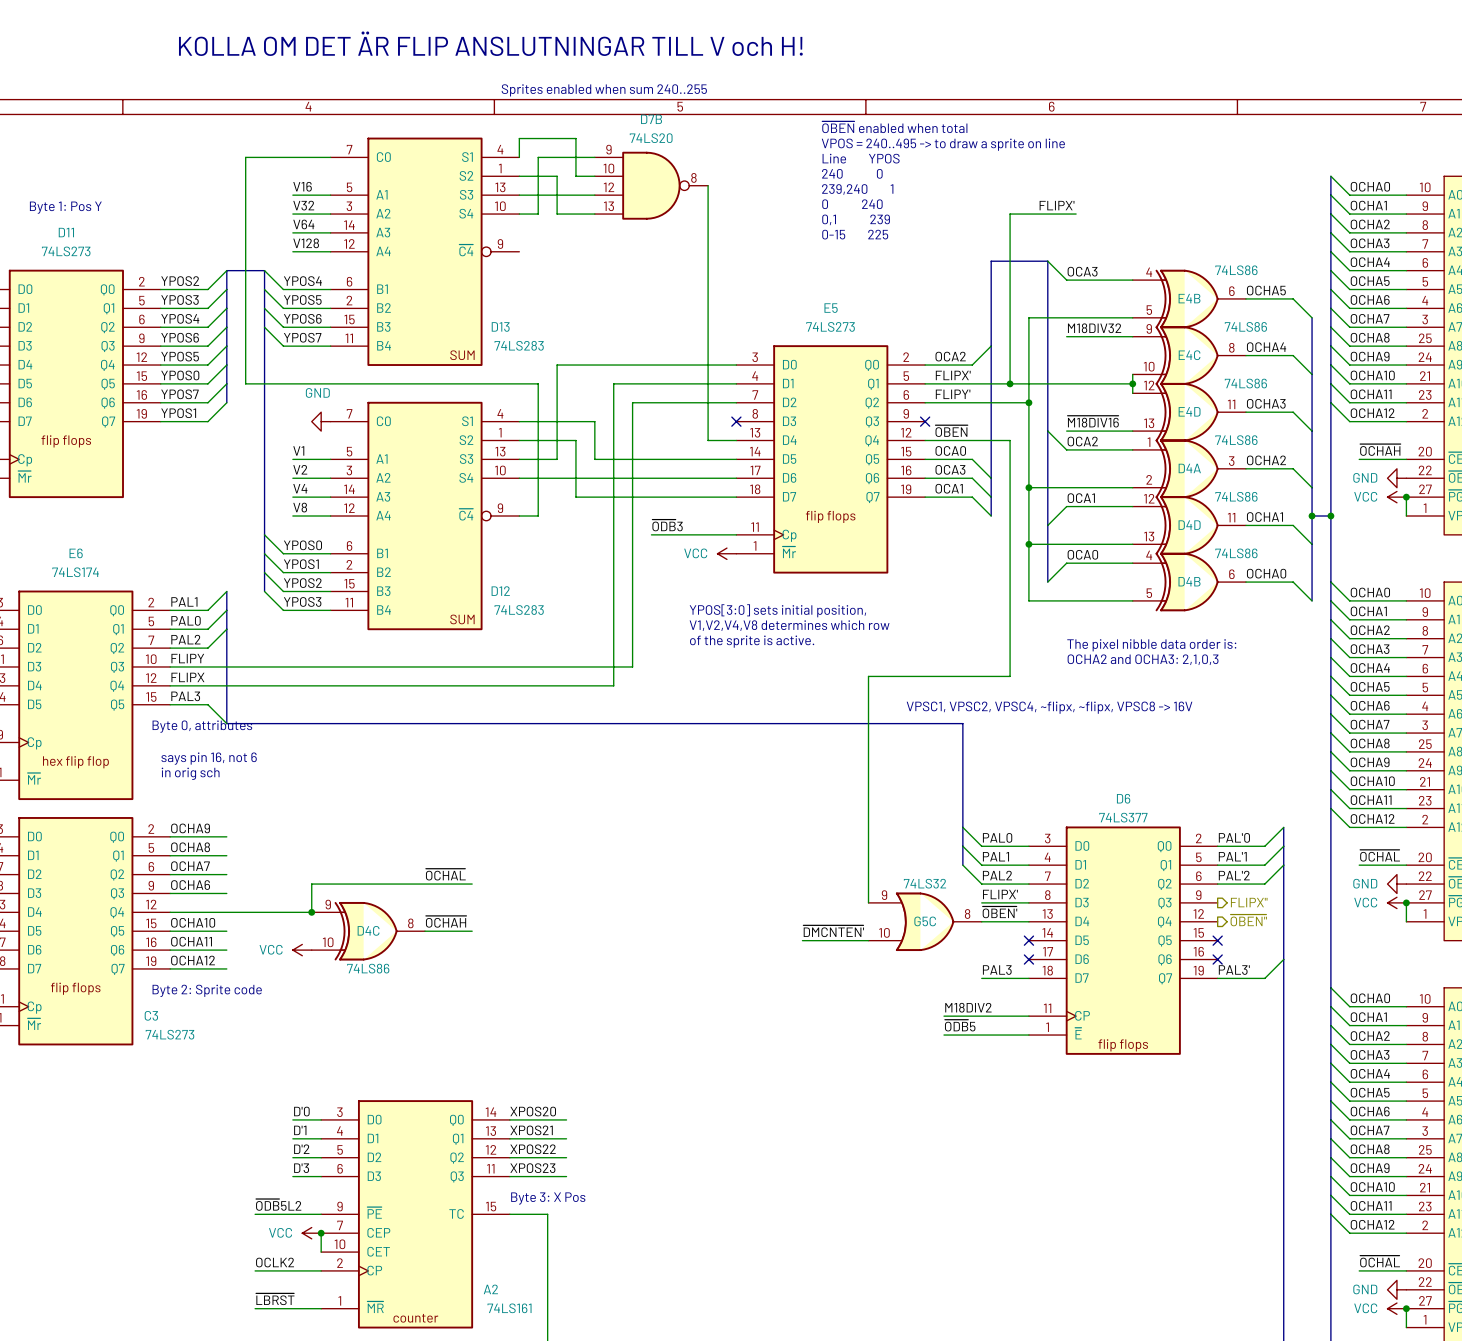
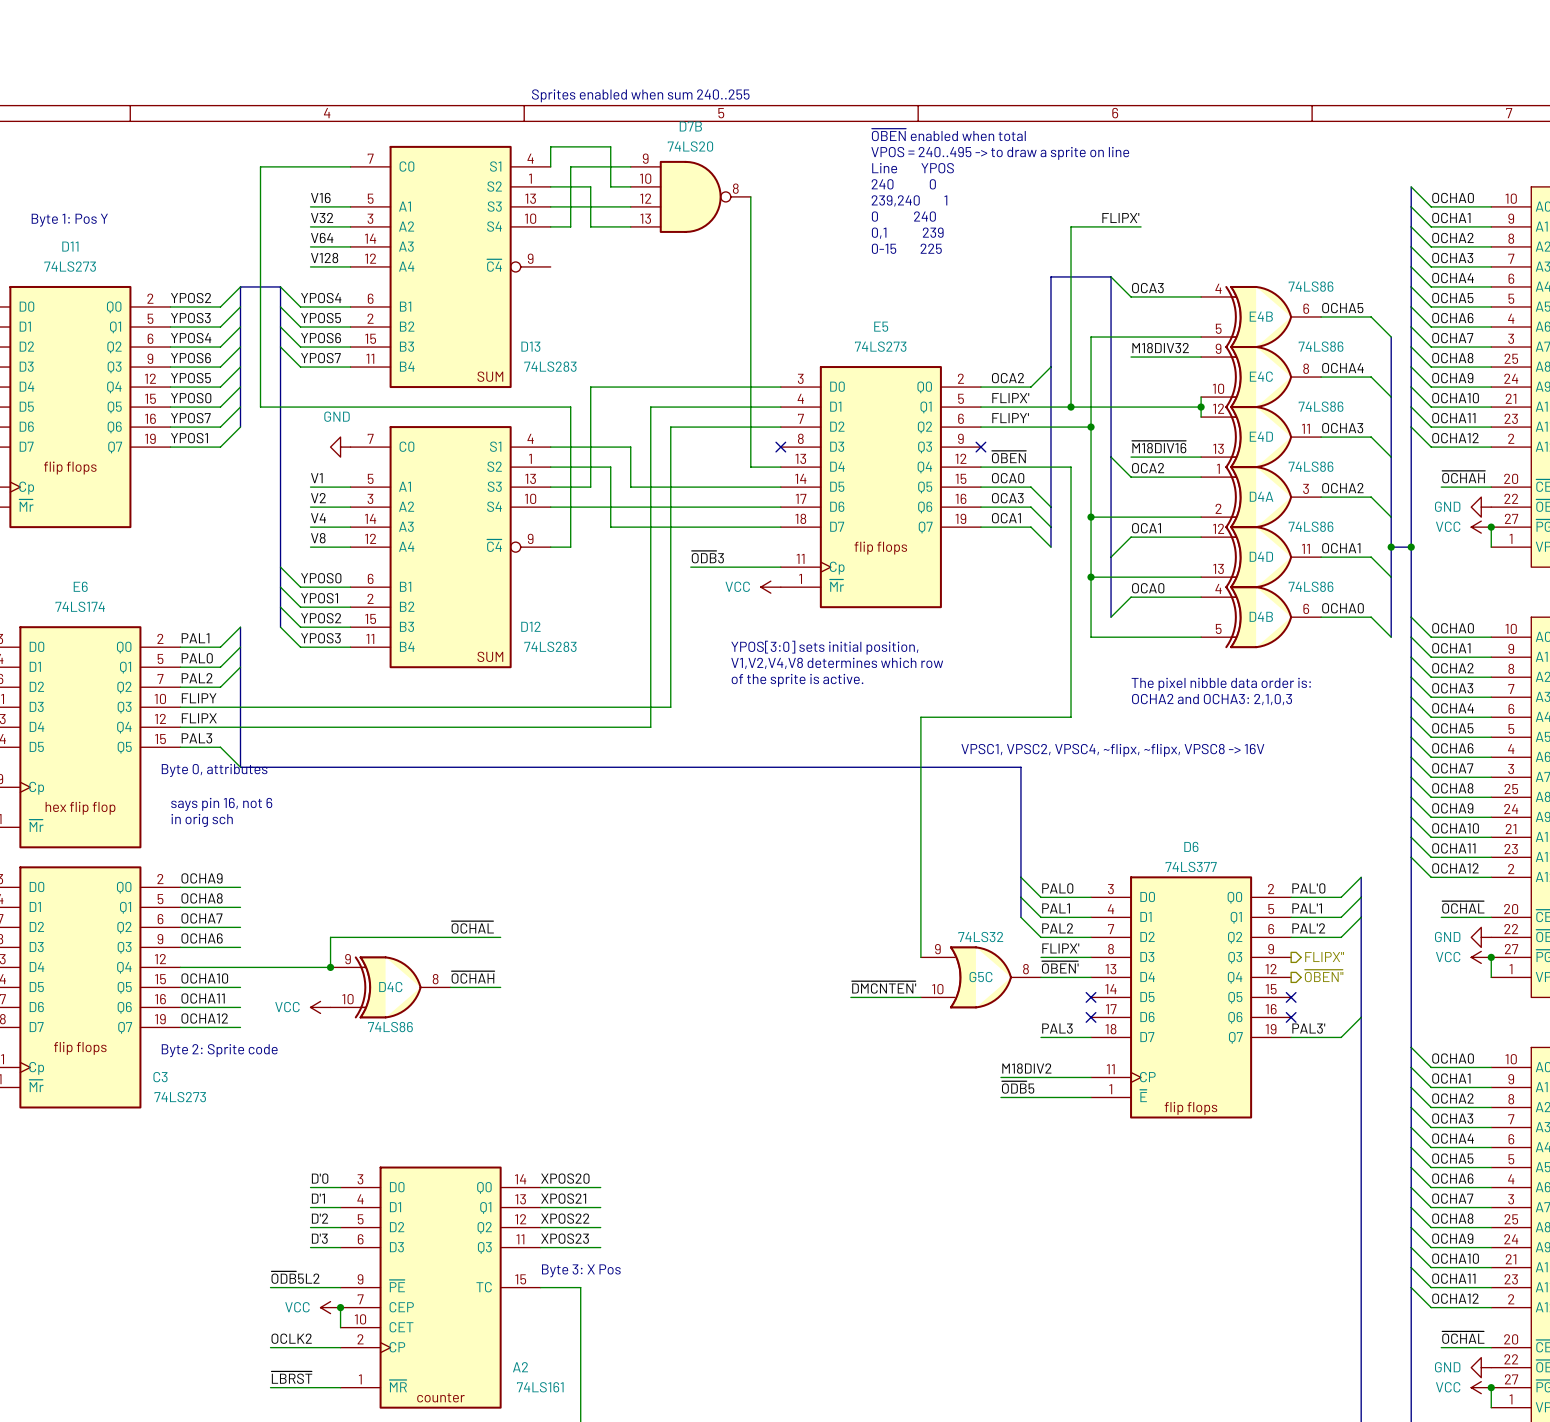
text: KOLLA OM DET ÄR FLIP ANSLUTNINGAR TILL V och H! (490, 43) -> none

